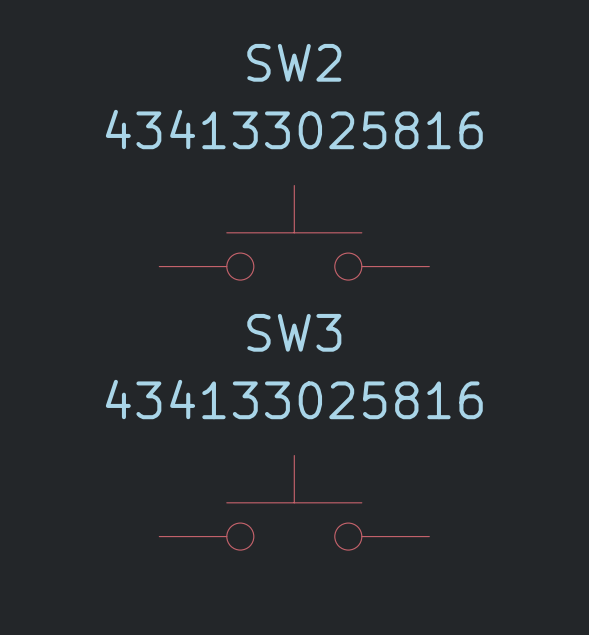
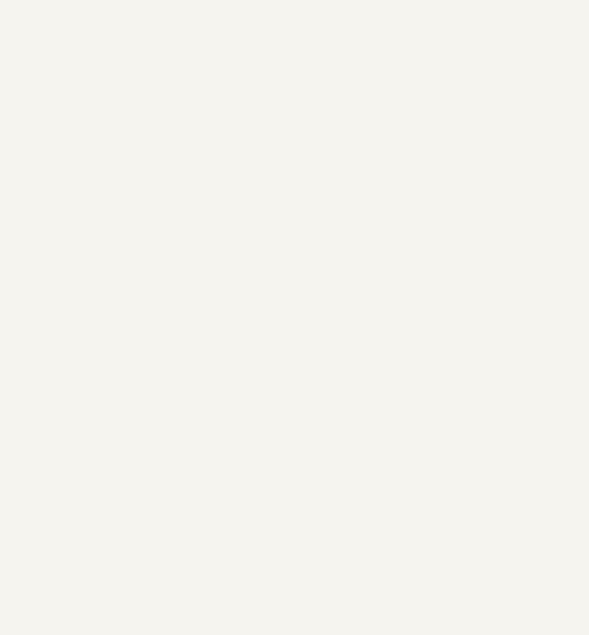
SW2: 434133025816 (294, 232) -> none
SW3: 434133025816 (294, 502) -> none

